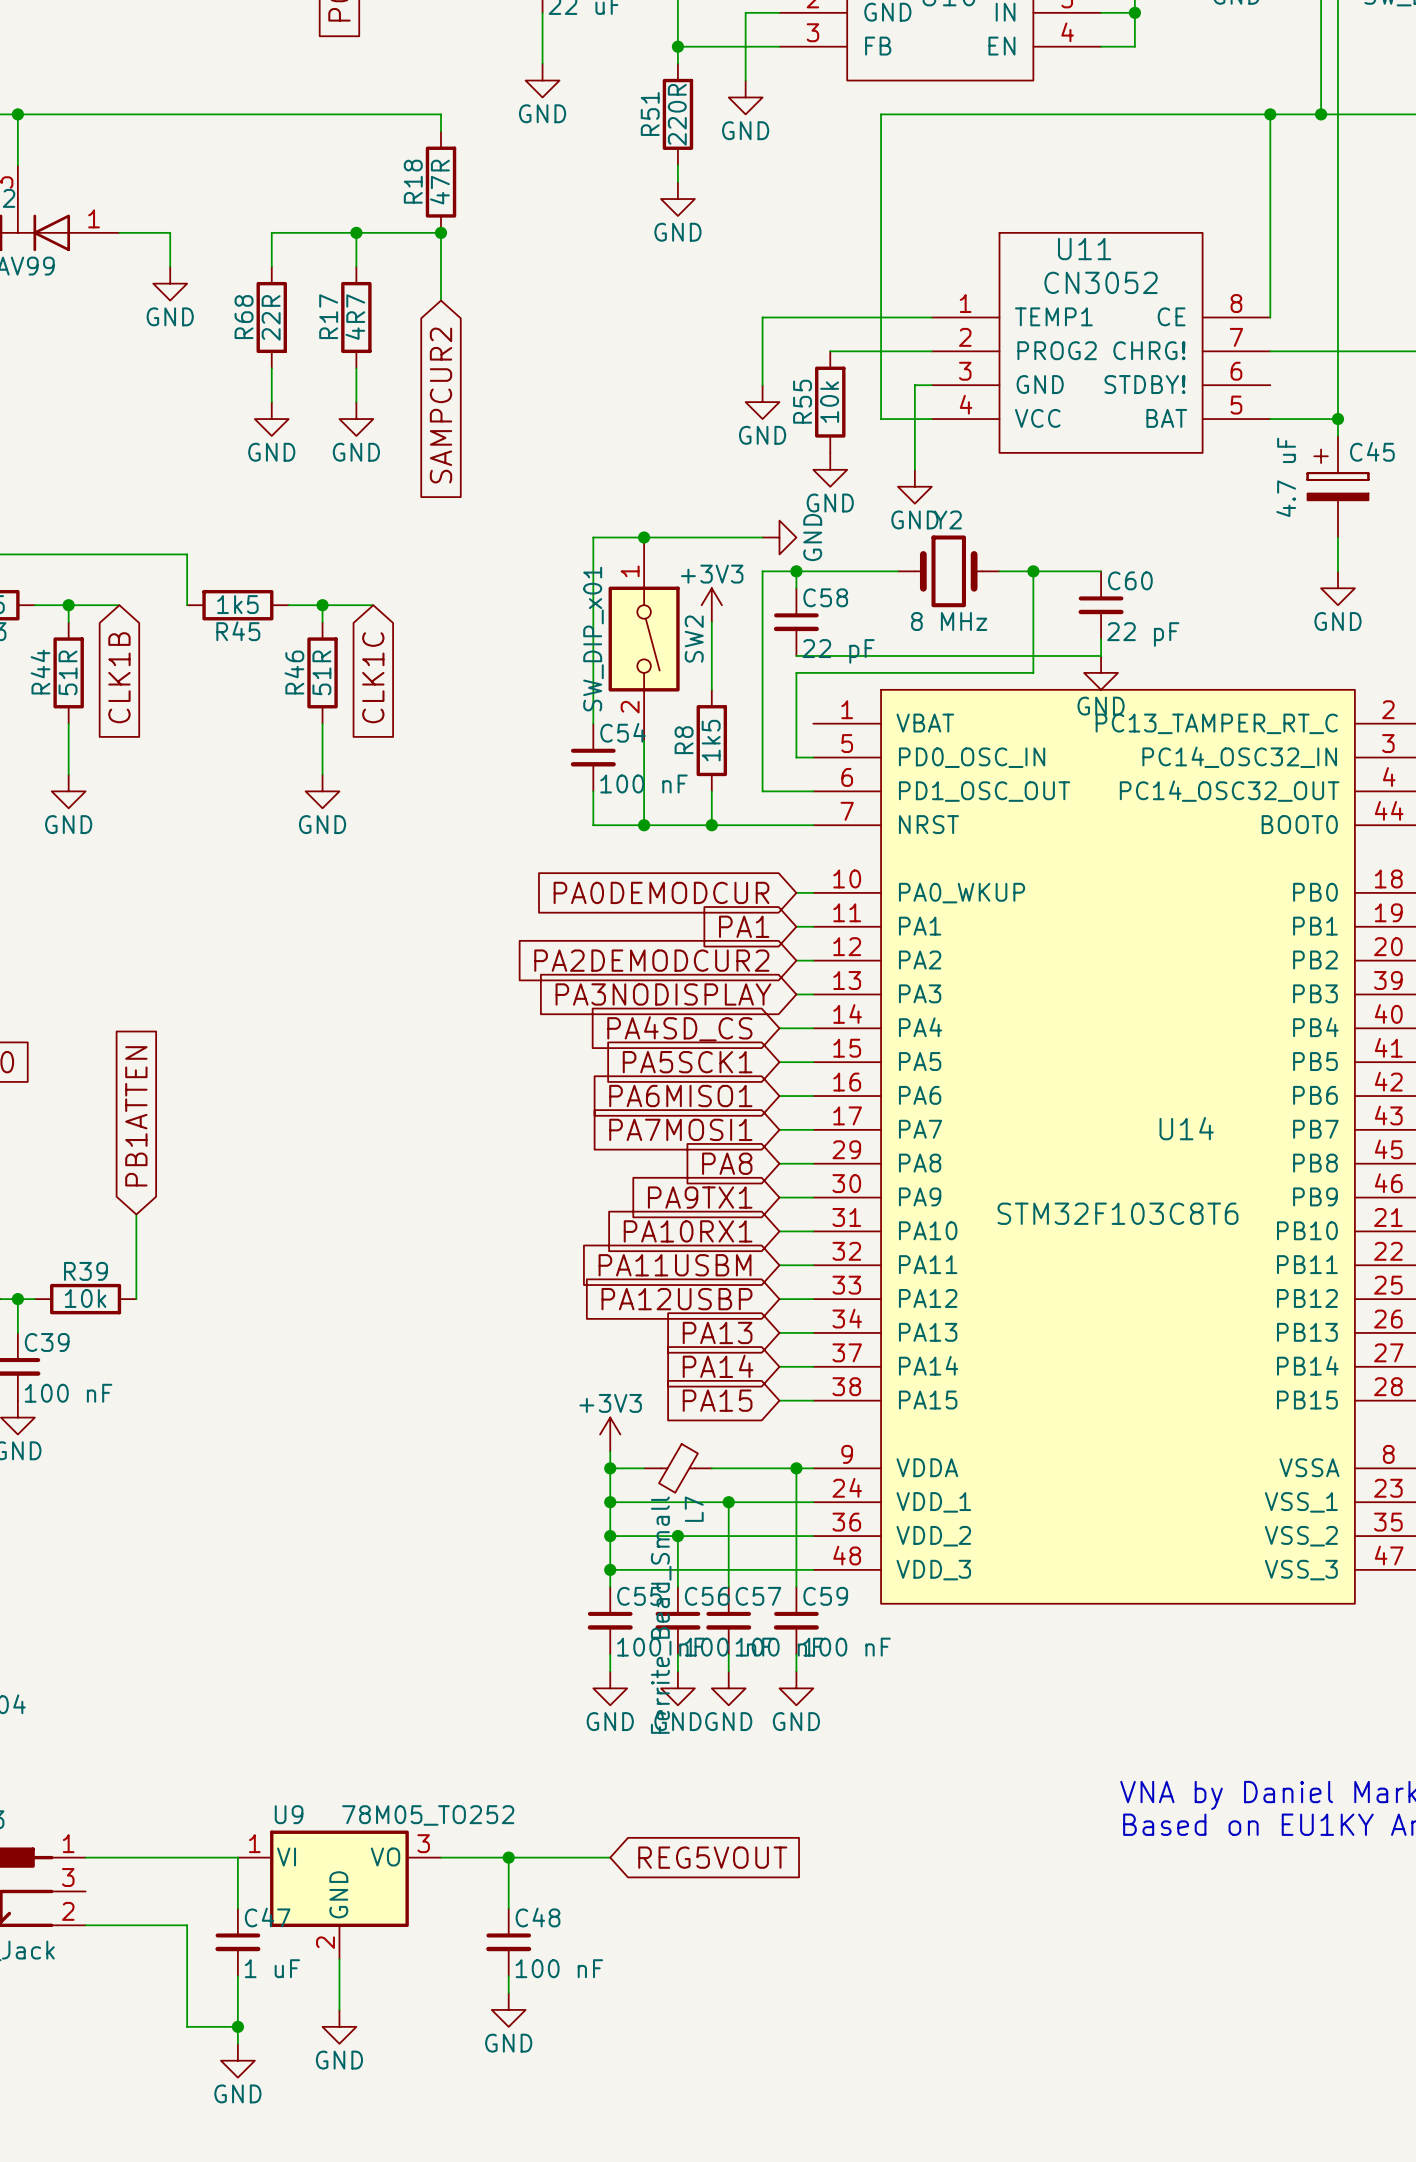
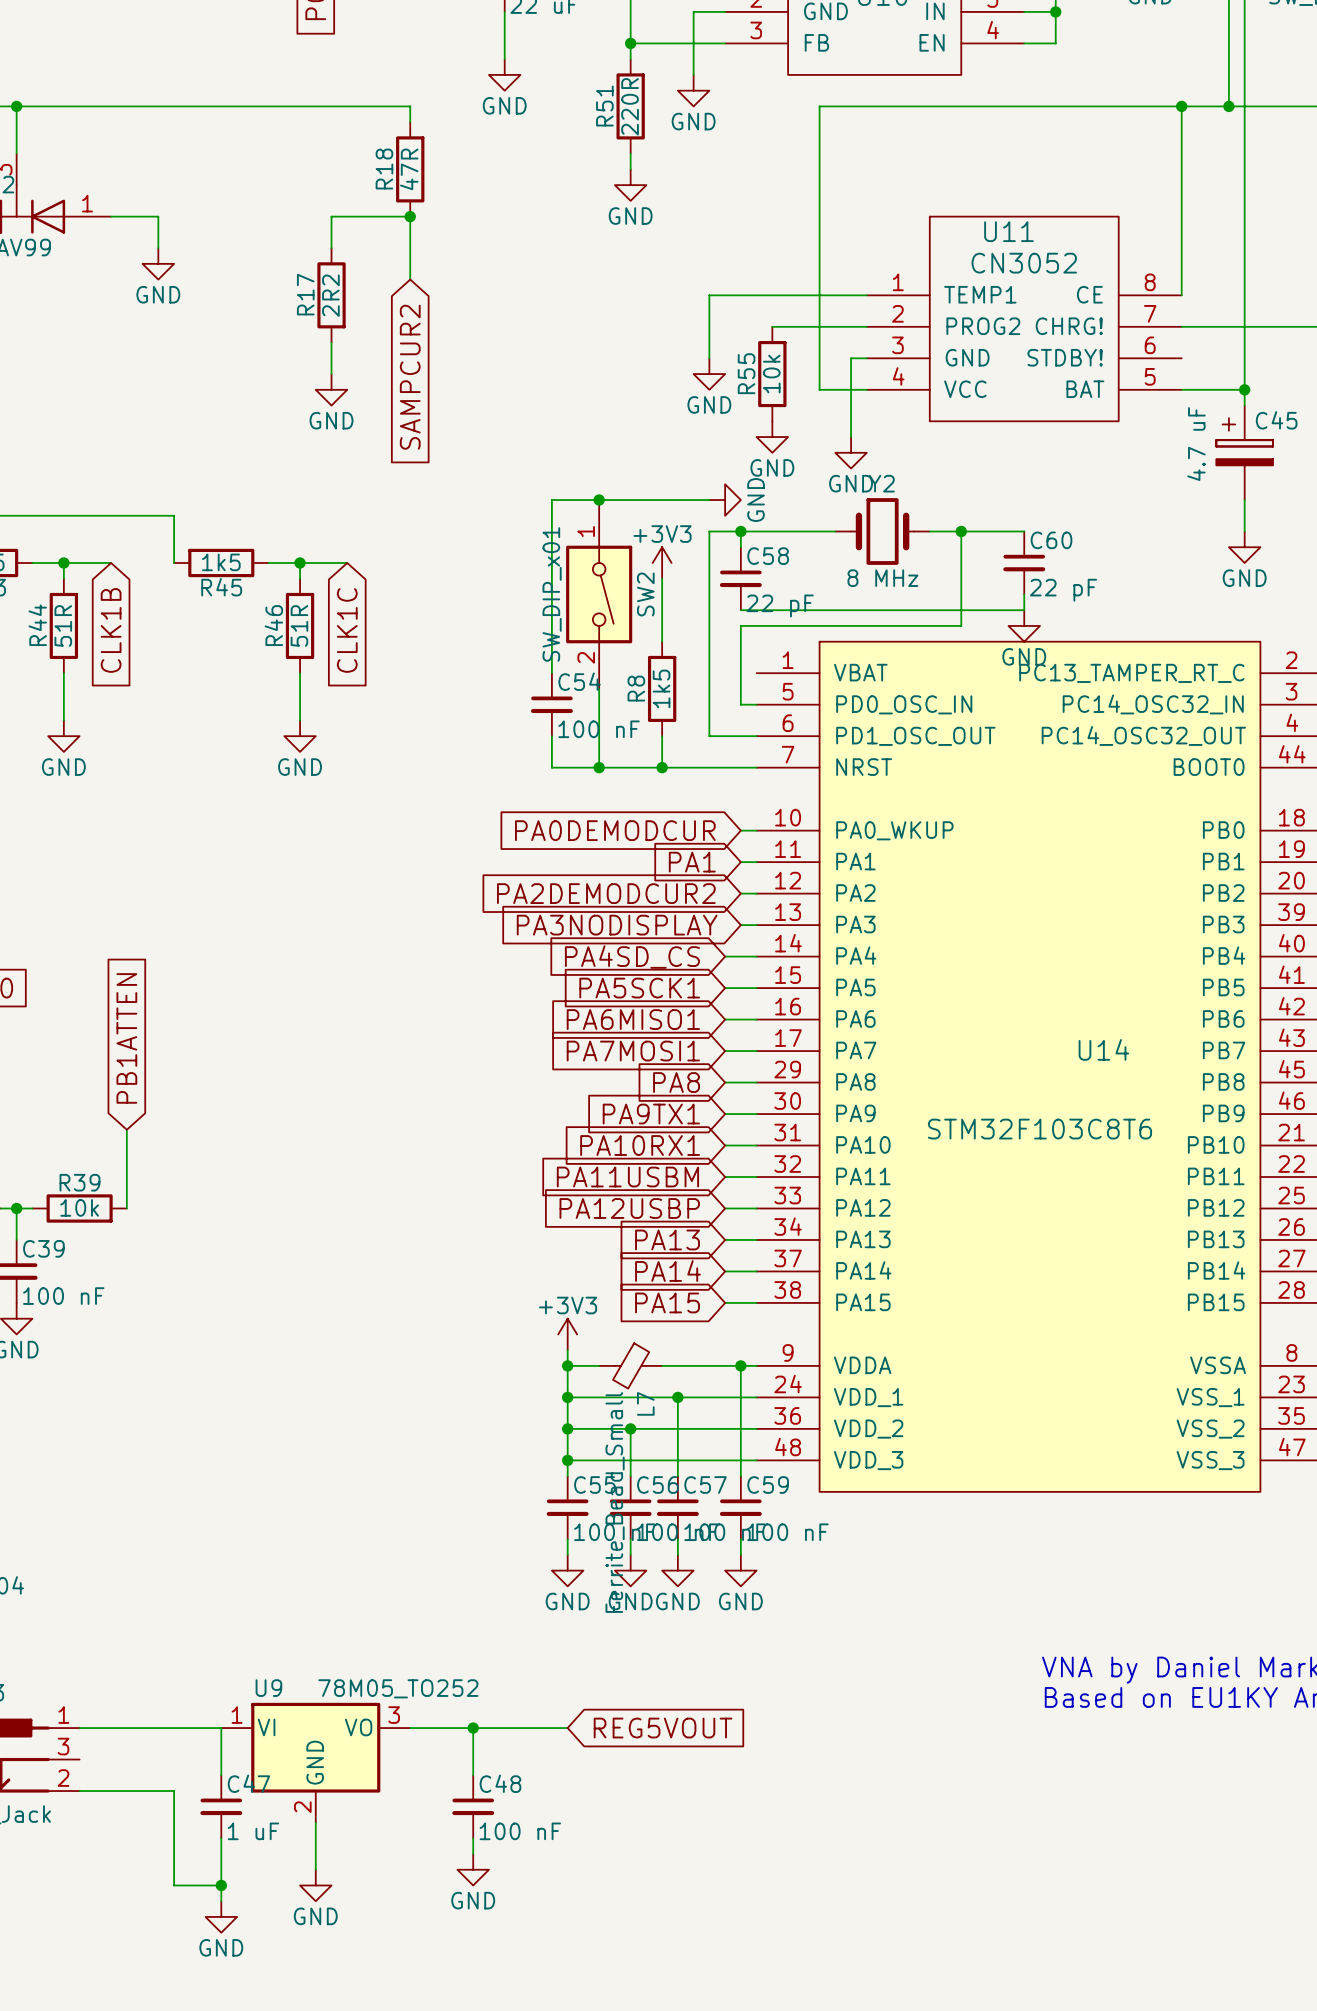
wire: (356, 232) (271, 232) (271, 266) -> none
junction: (356, 232) -> none
R68: 22R (271, 317) -> none
R17 value: 4R7 (355, 317) -> 2R2 (330, 295)
wire: (271, 368) (271, 402) -> none
power symbol: GND (271, 419) -> none

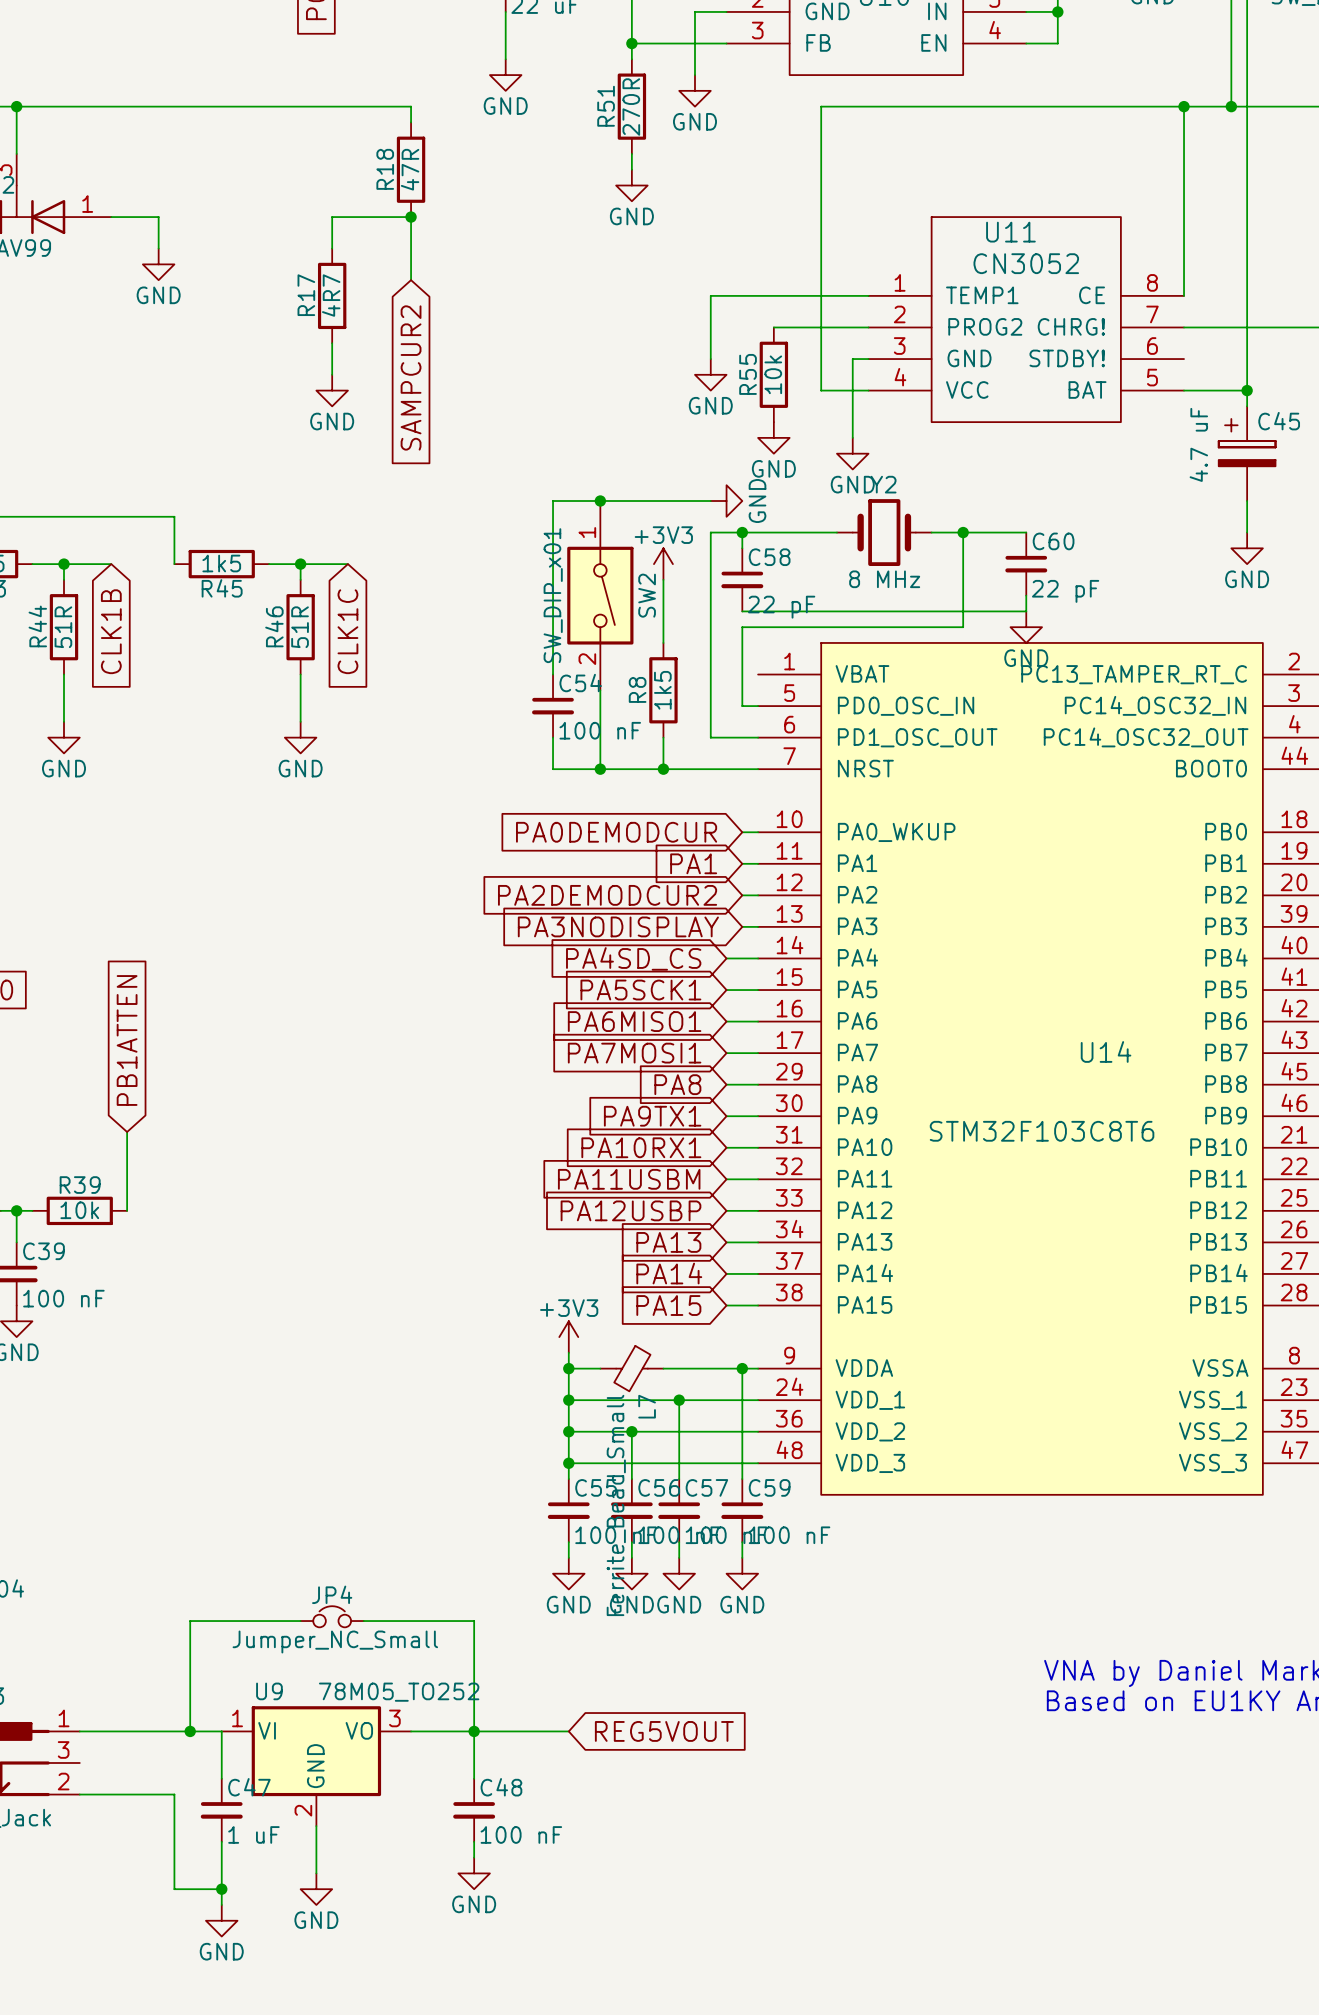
R51 value: 220R (630, 106) -> 270R (631, 107)
R17 value: 2R2 (330, 295) -> 4R7 (331, 295)
JP4: none -> Jumper_NC_Small (332, 1616)
wire: none -> (300, 1621) (190, 1621) (190, 1731)
wire: none -> (363, 1621) (474, 1621) (474, 1731)
junction: none -> (190, 1731)

